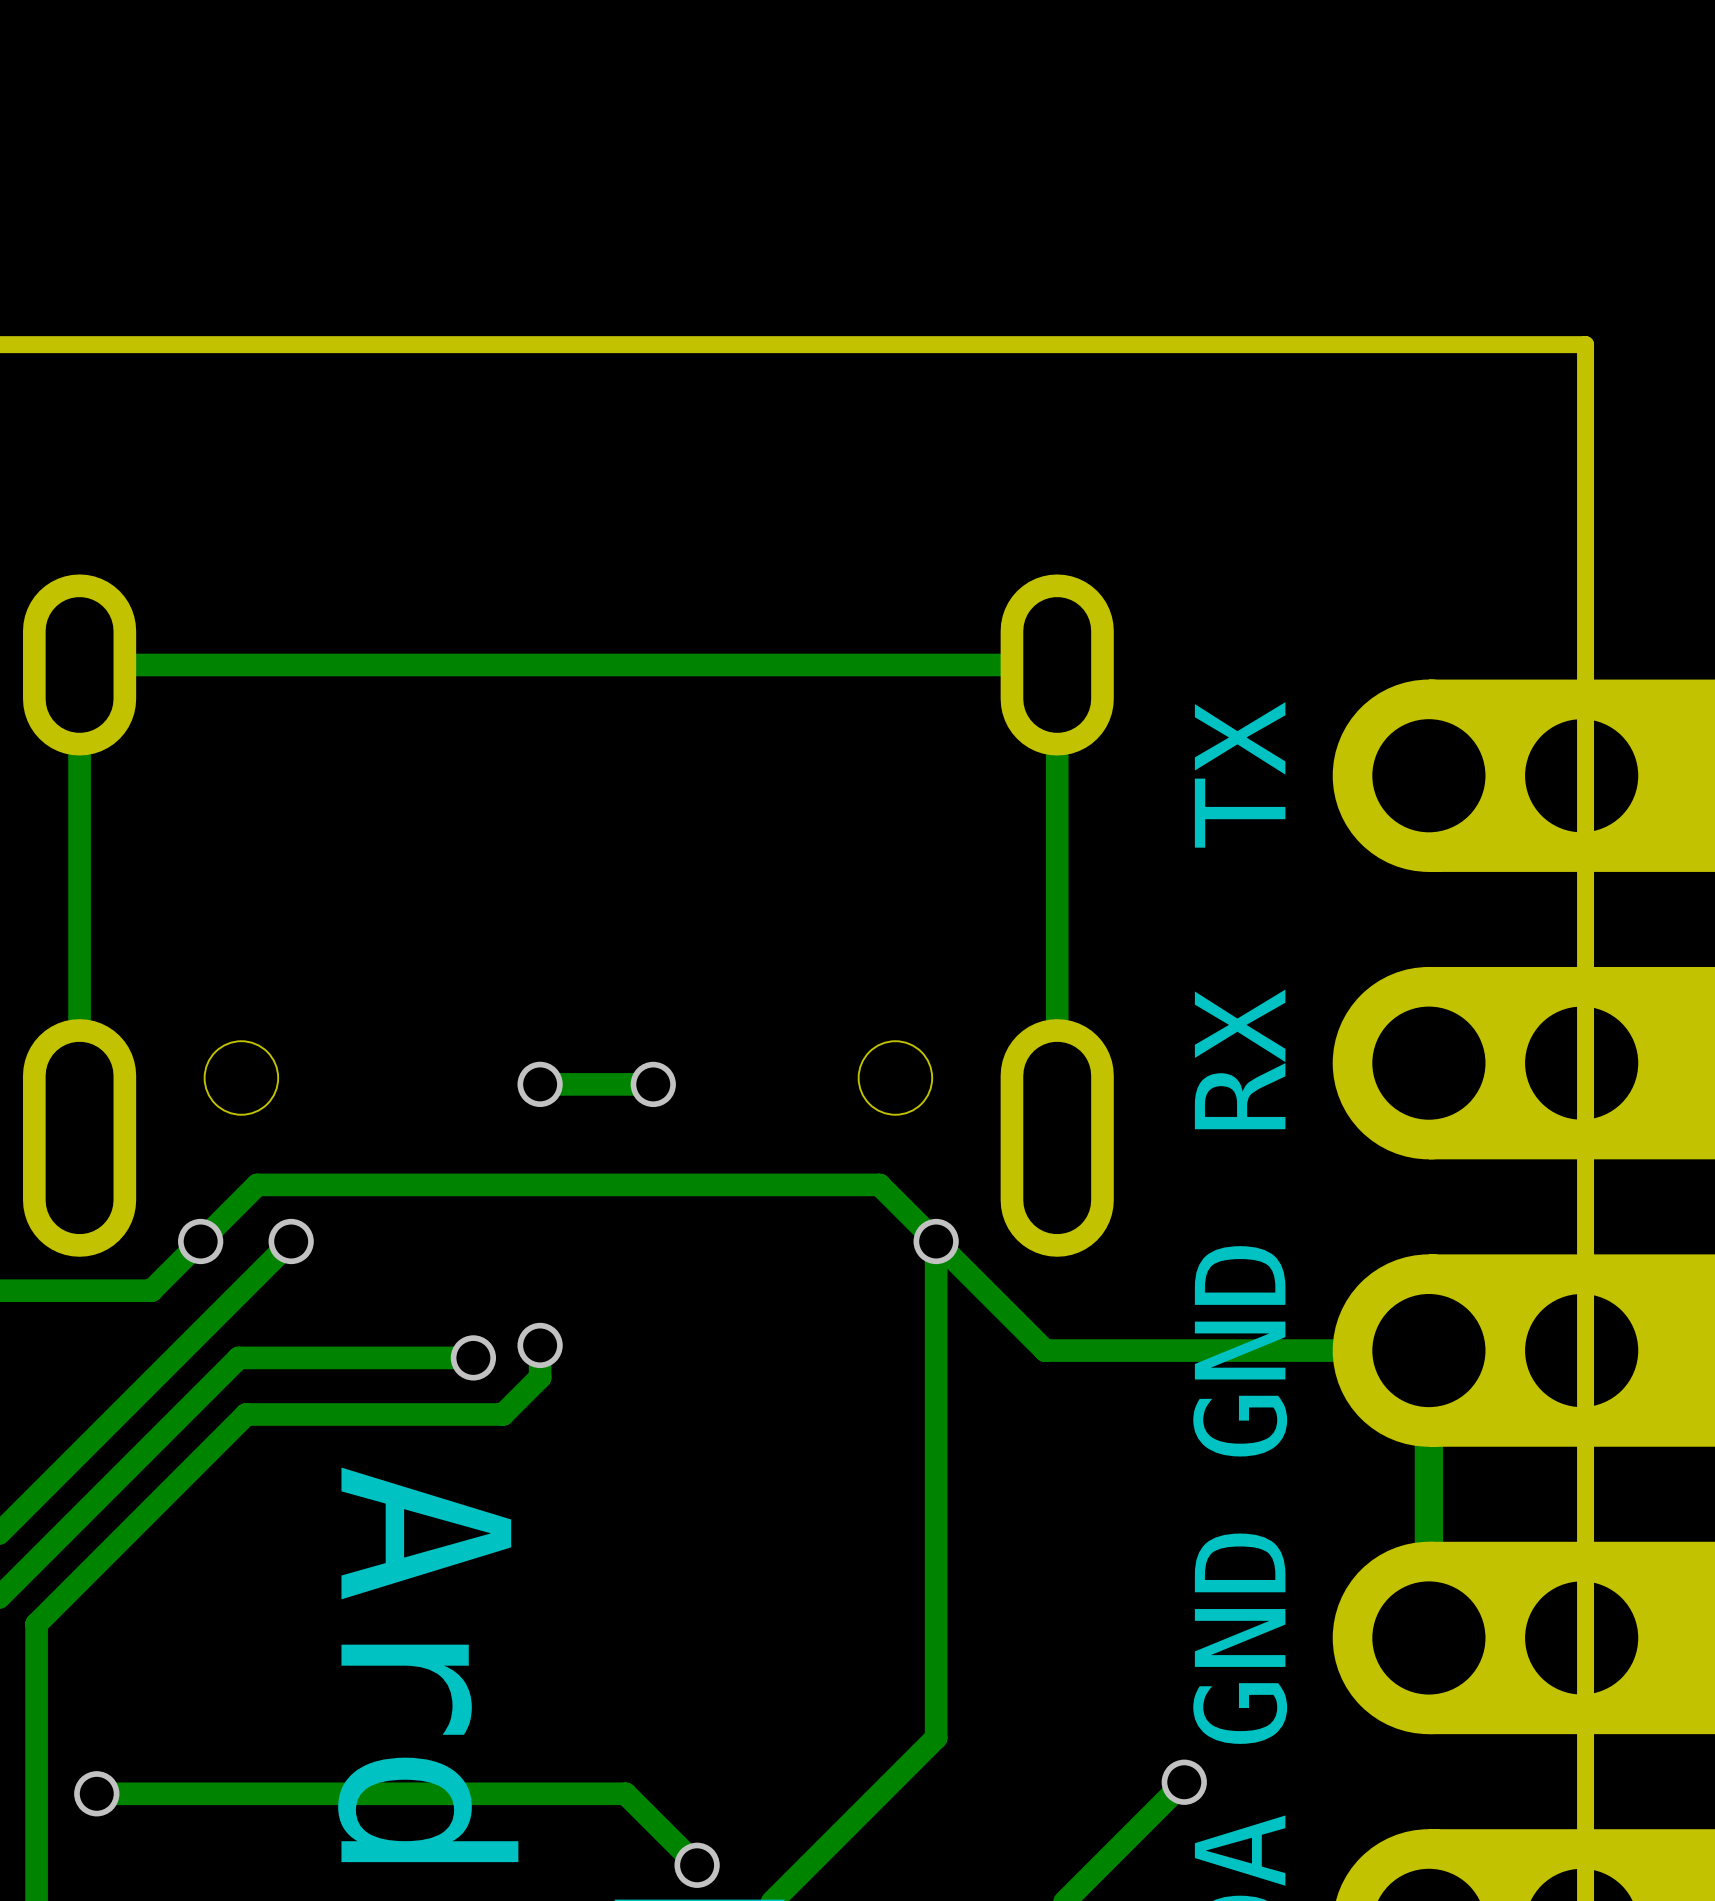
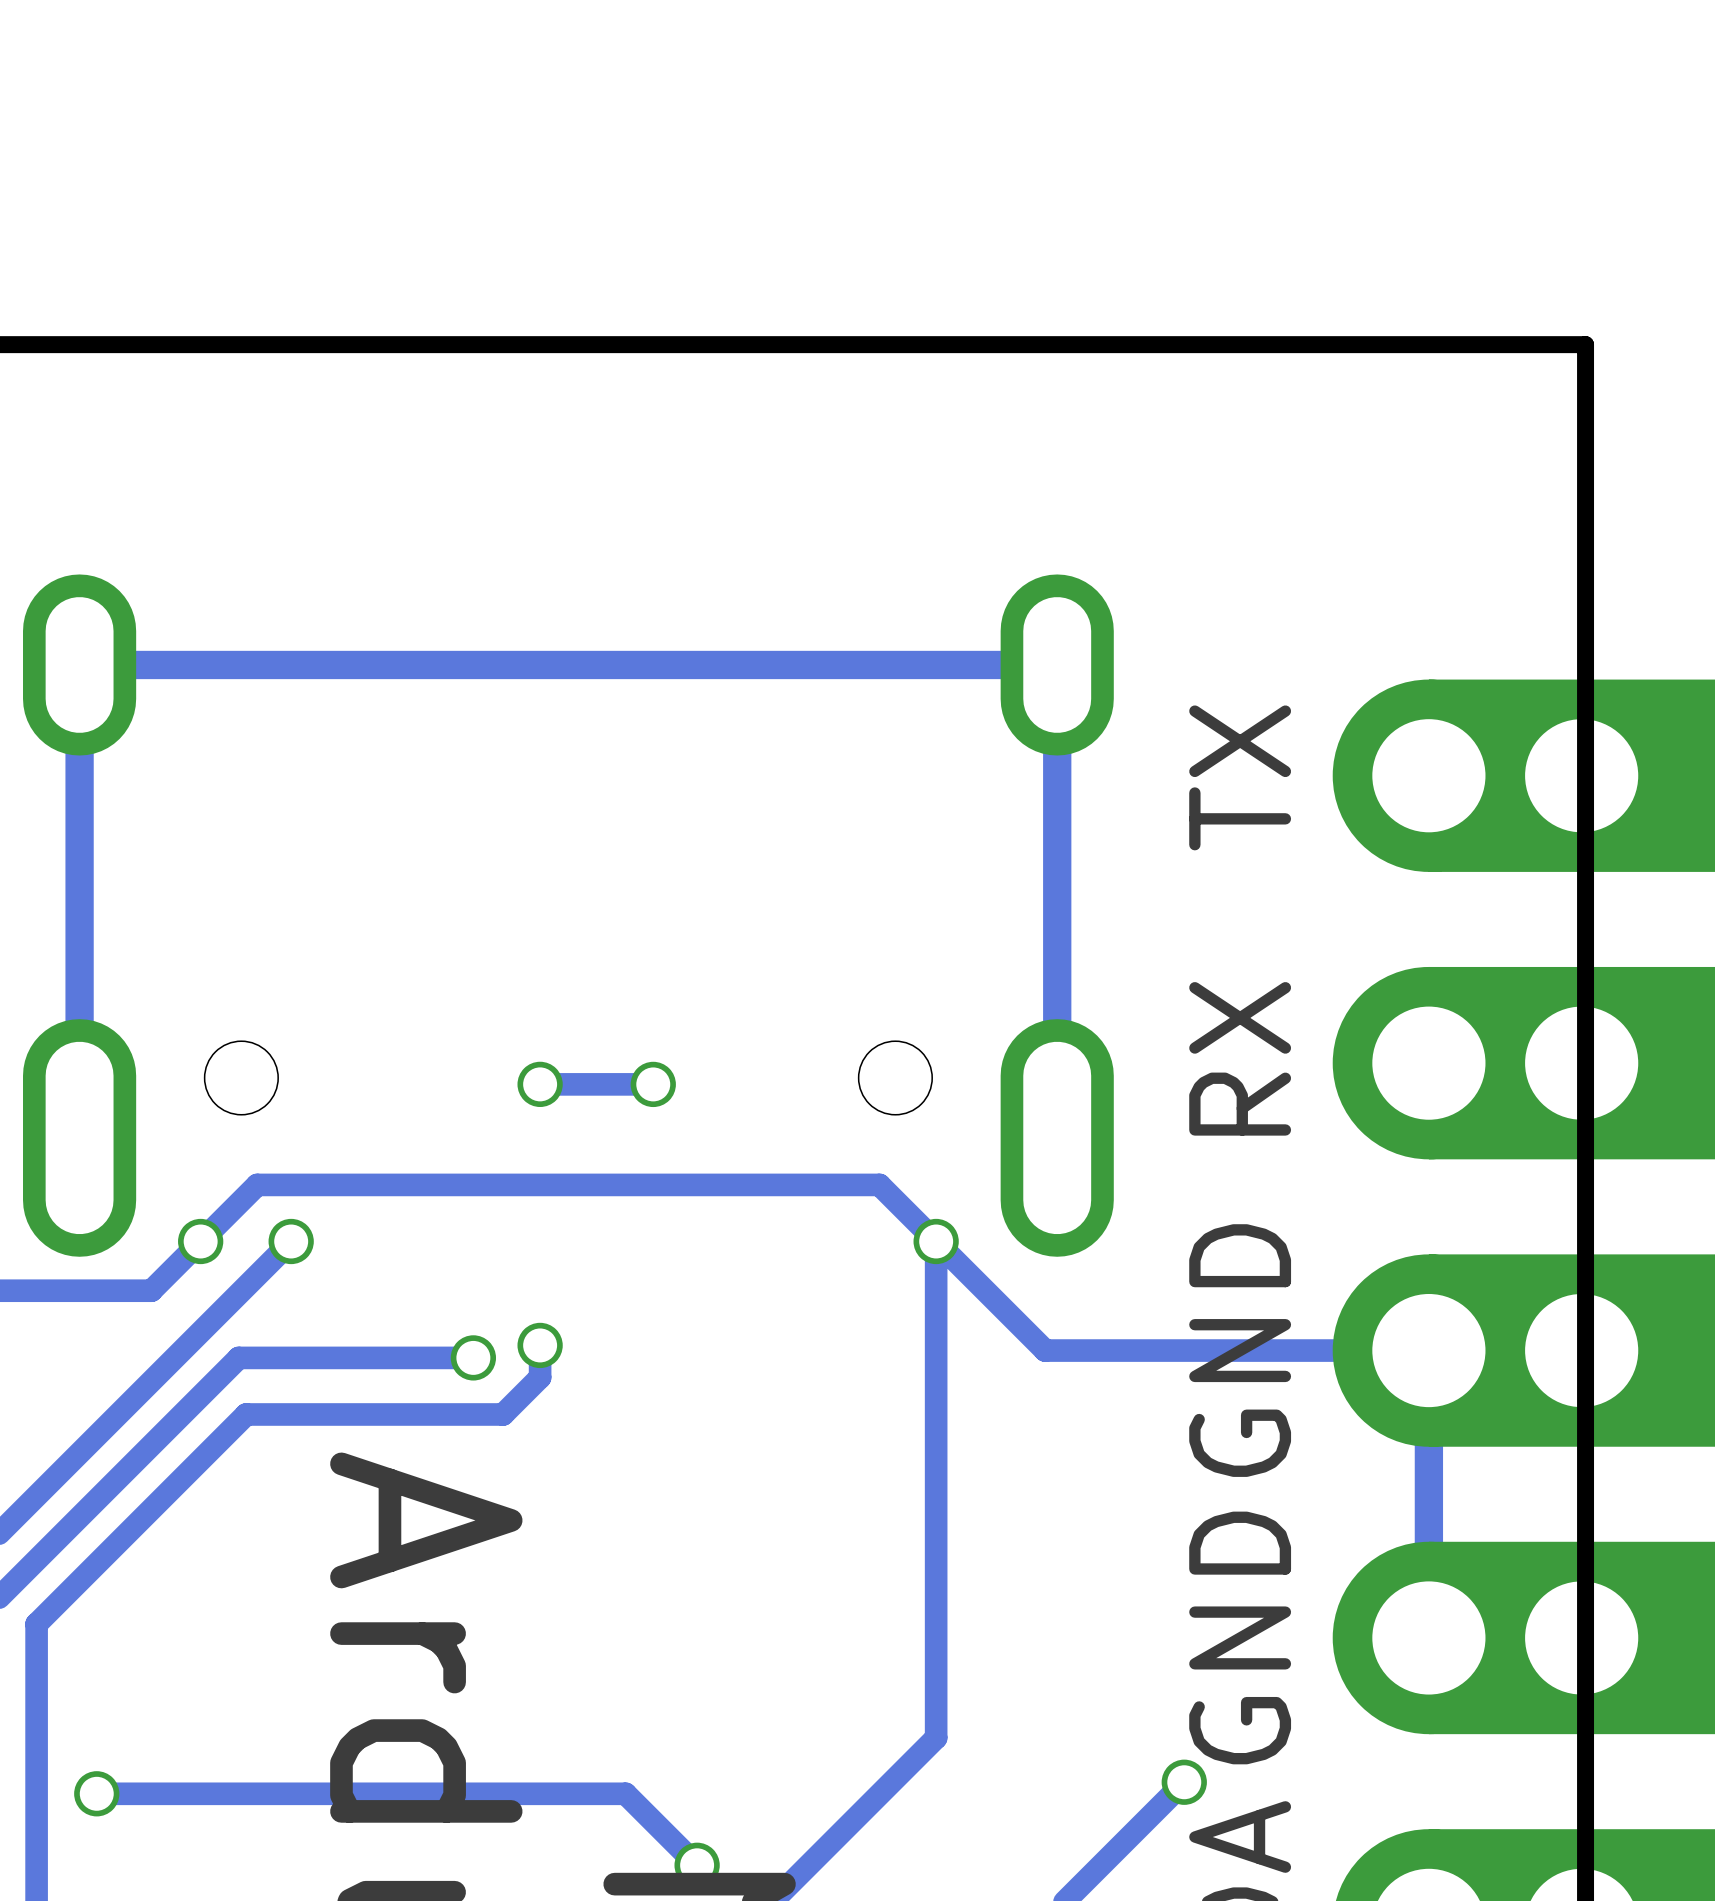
track width: thin (1057, 1137) (1057, 664) (79, 664) (79, 1137) -> thick (1057, 1137) (1057, 664) (79, 664) (79, 1137)

